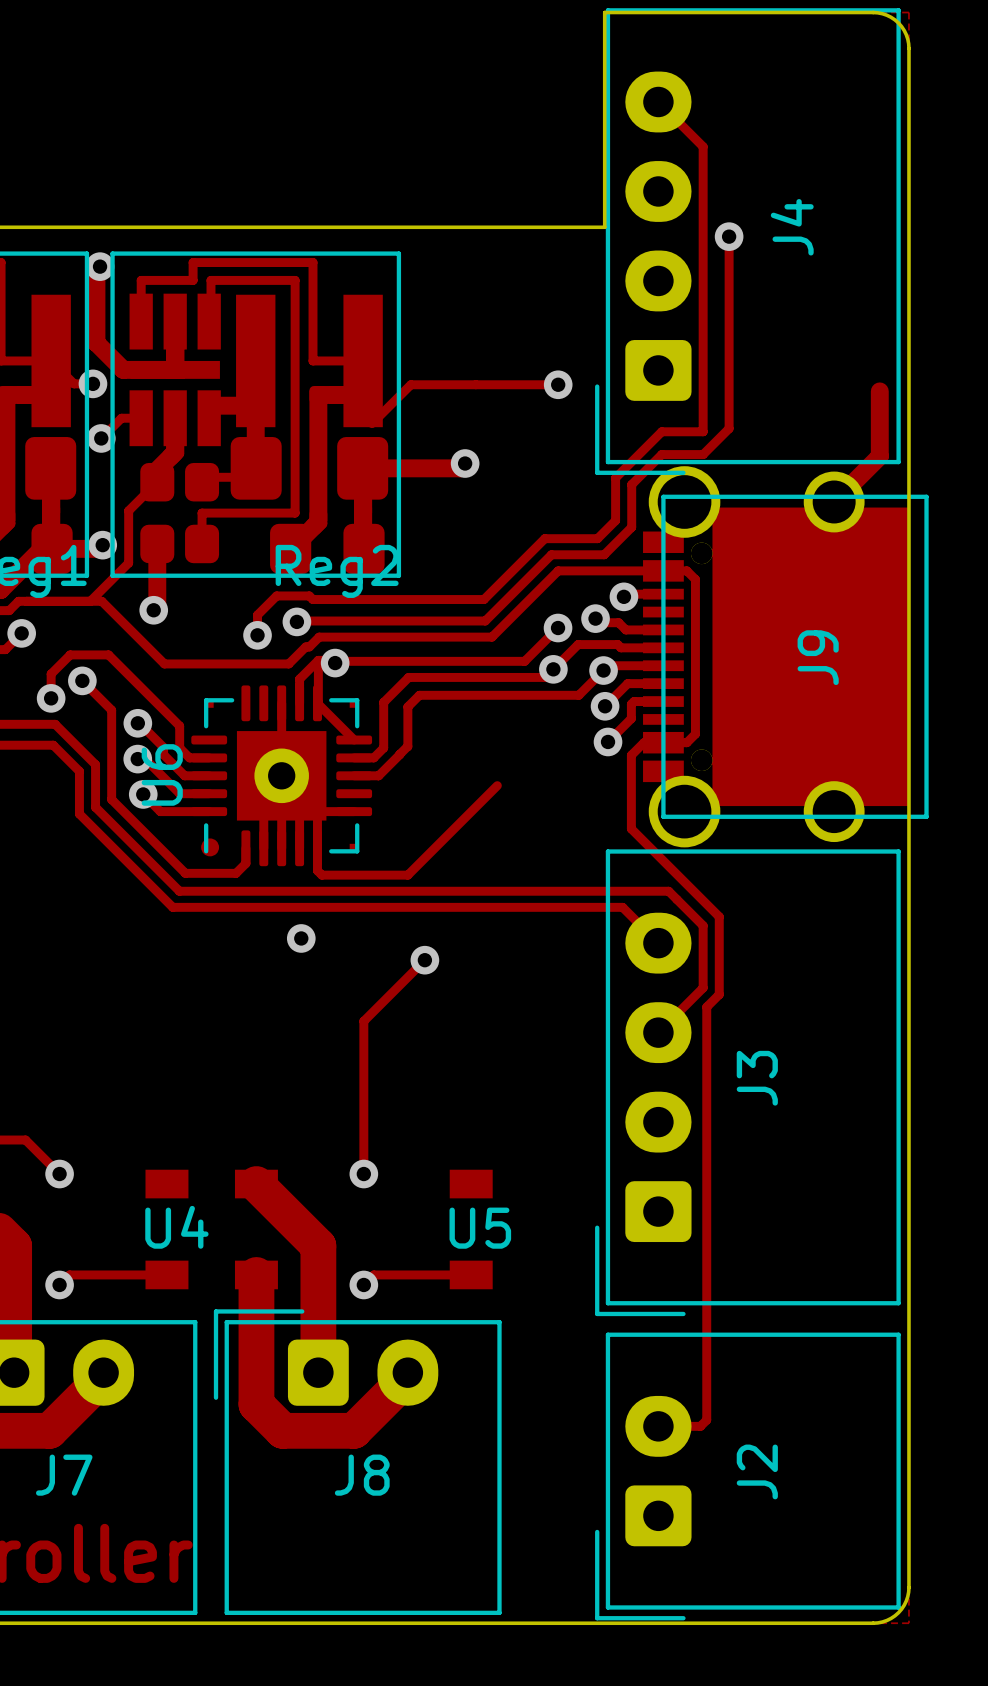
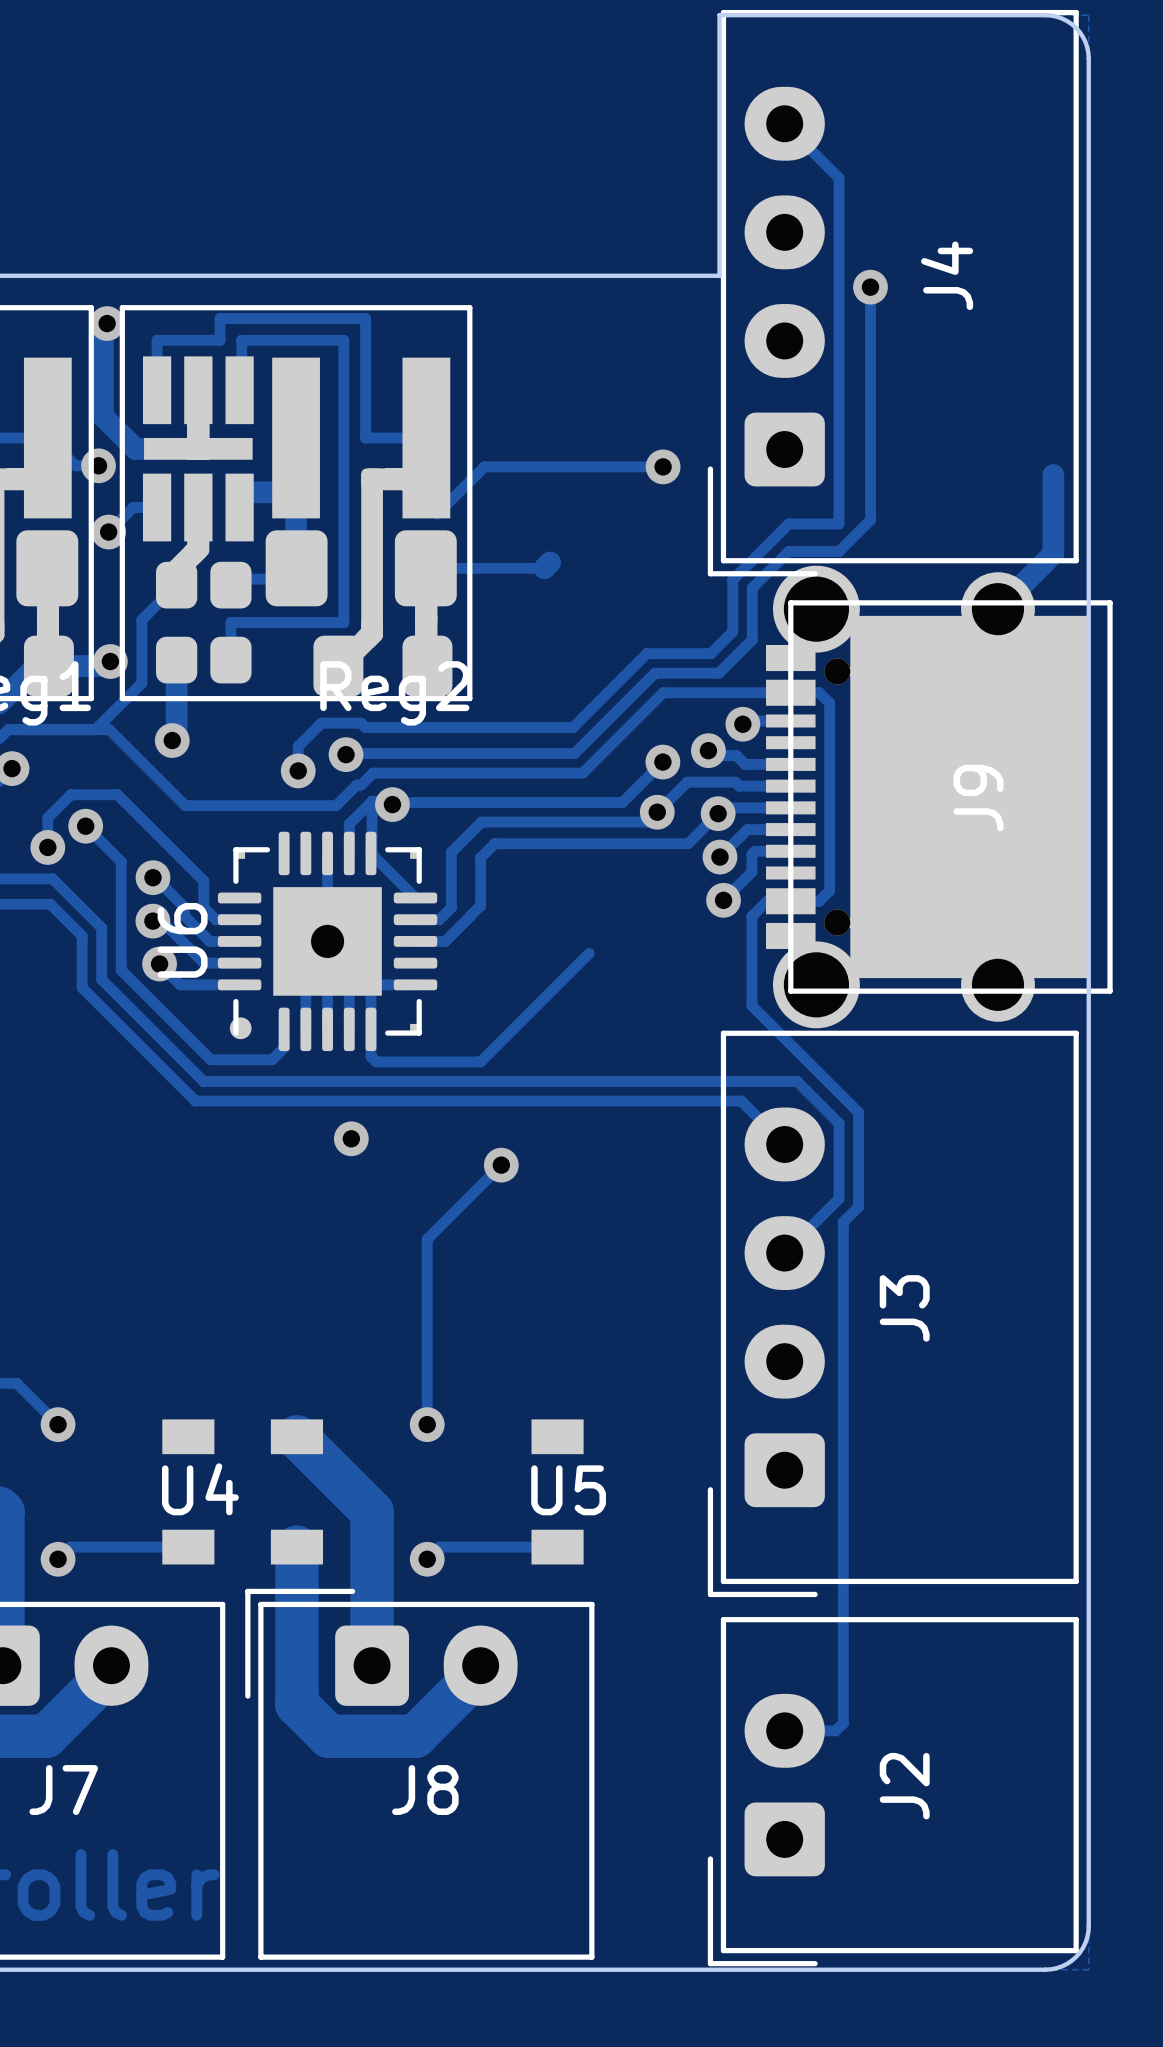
via: (465, 463) -> none
track width: thick (362, 468) (460, 468) -> thin (425, 568) (544, 568)

